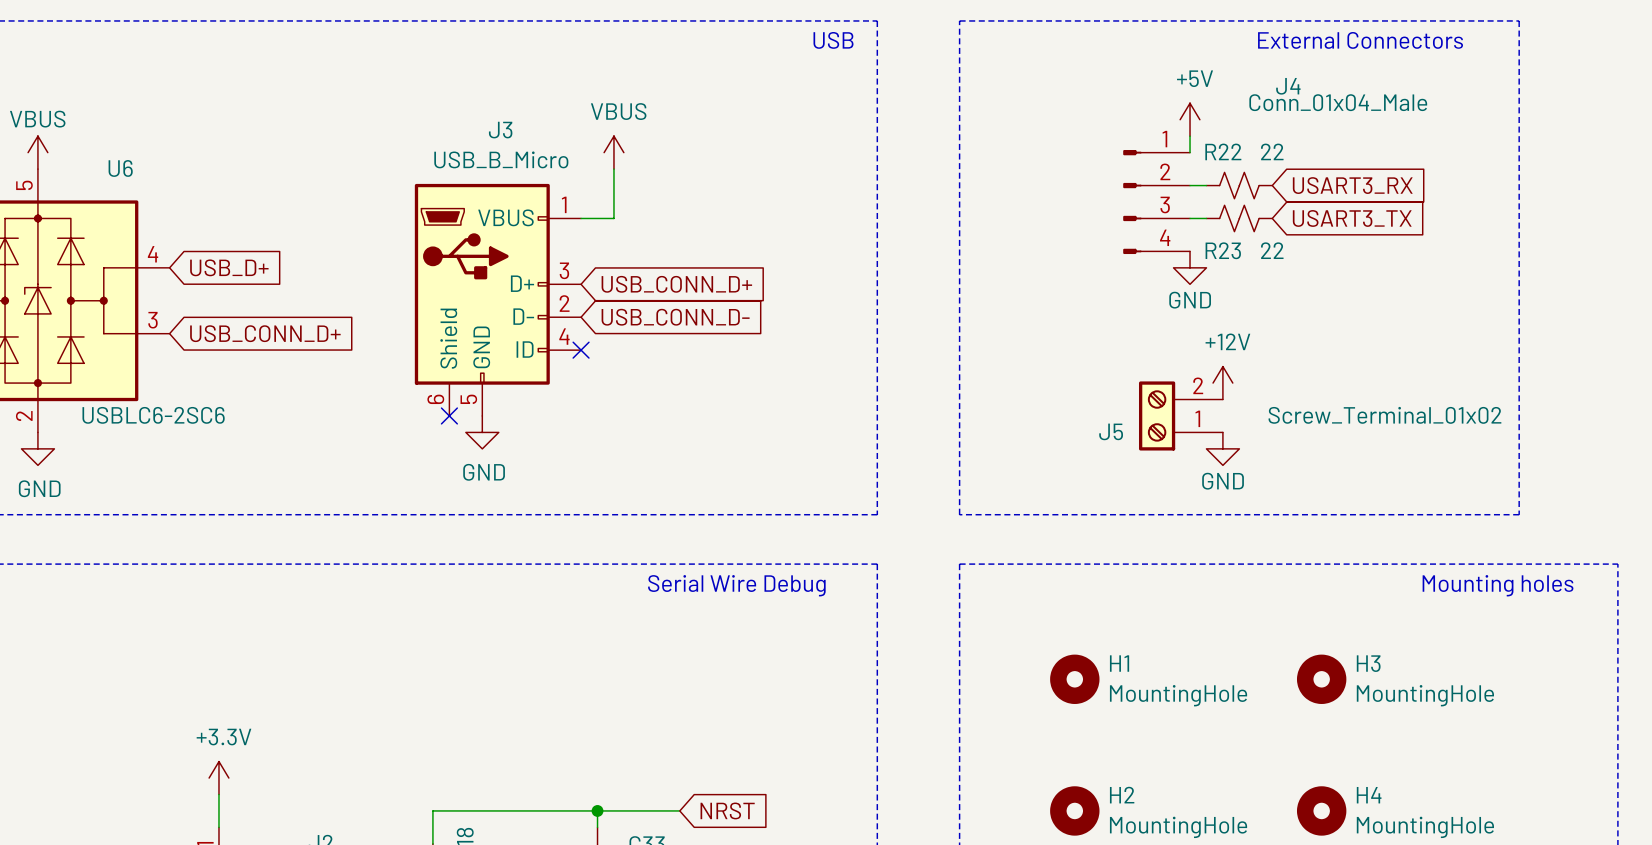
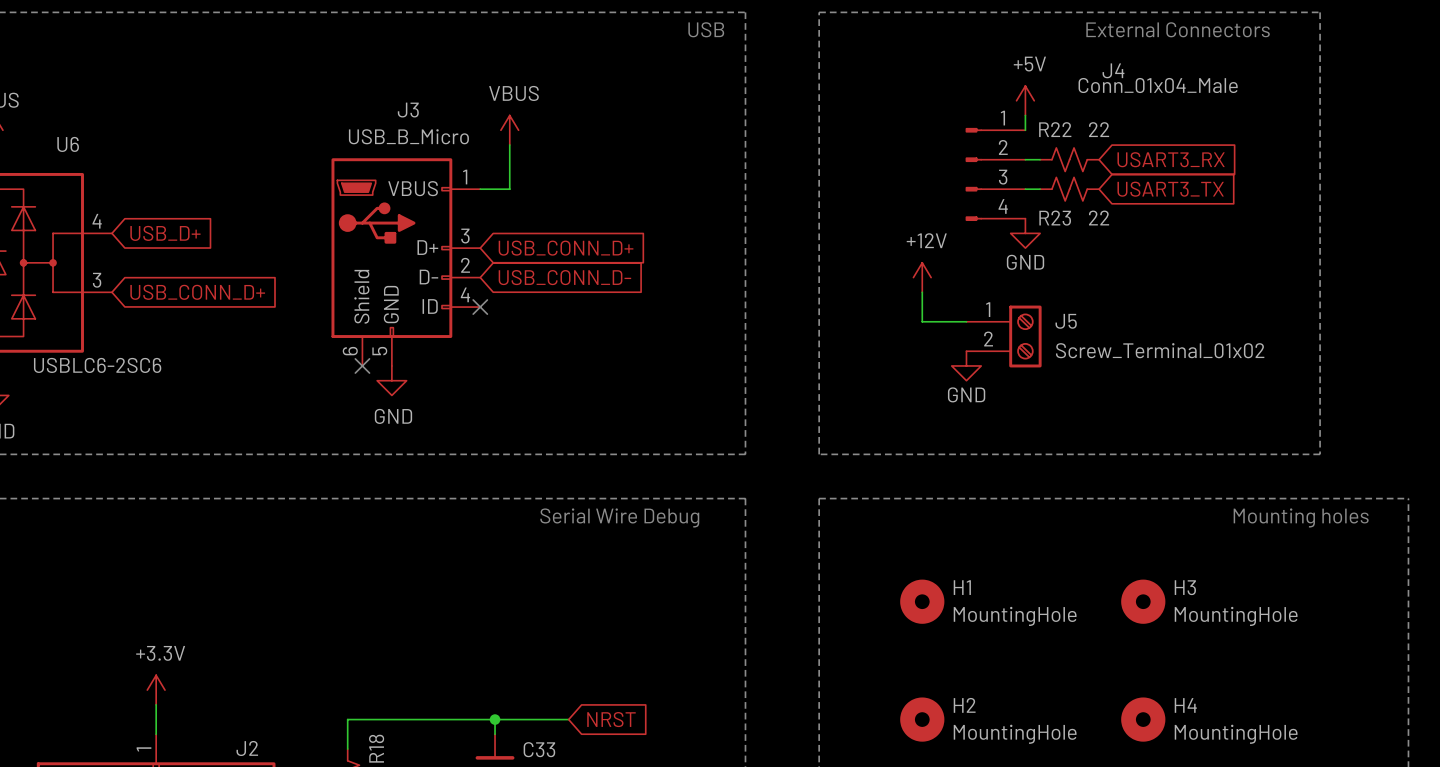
wire: none -> (922, 292) (922, 321) (966, 321)
power symbol position: +12V (1222, 383) -> +12V (922, 277)
J5 rotation: 0° (1157, 415) -> 180° (1025, 336)
J5 value position: Screw_Terminal_01x02 (1384, 415) -> Screw_Terminal_01x02 (1160, 350)
power symbol position: GND (1222, 448) -> GND (966, 365)

